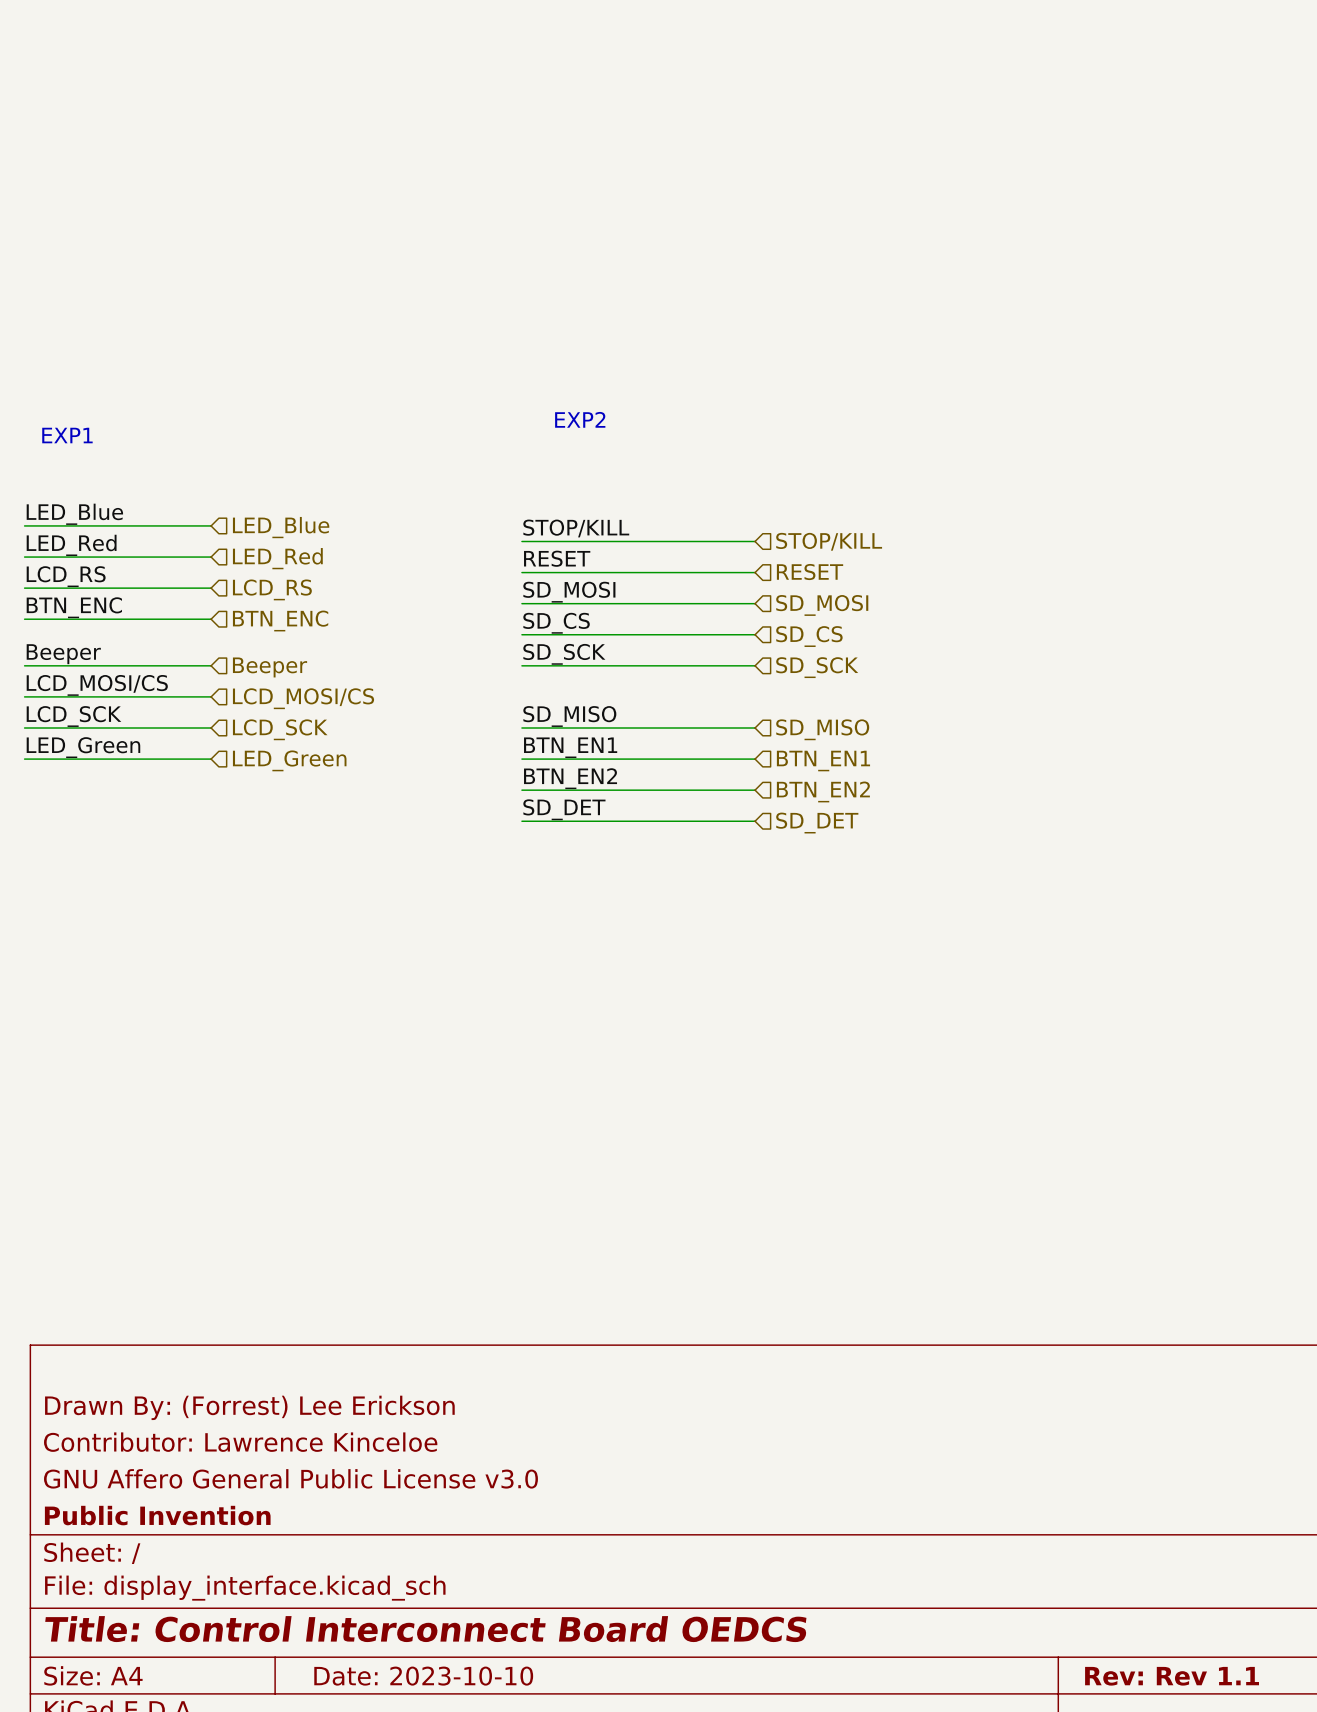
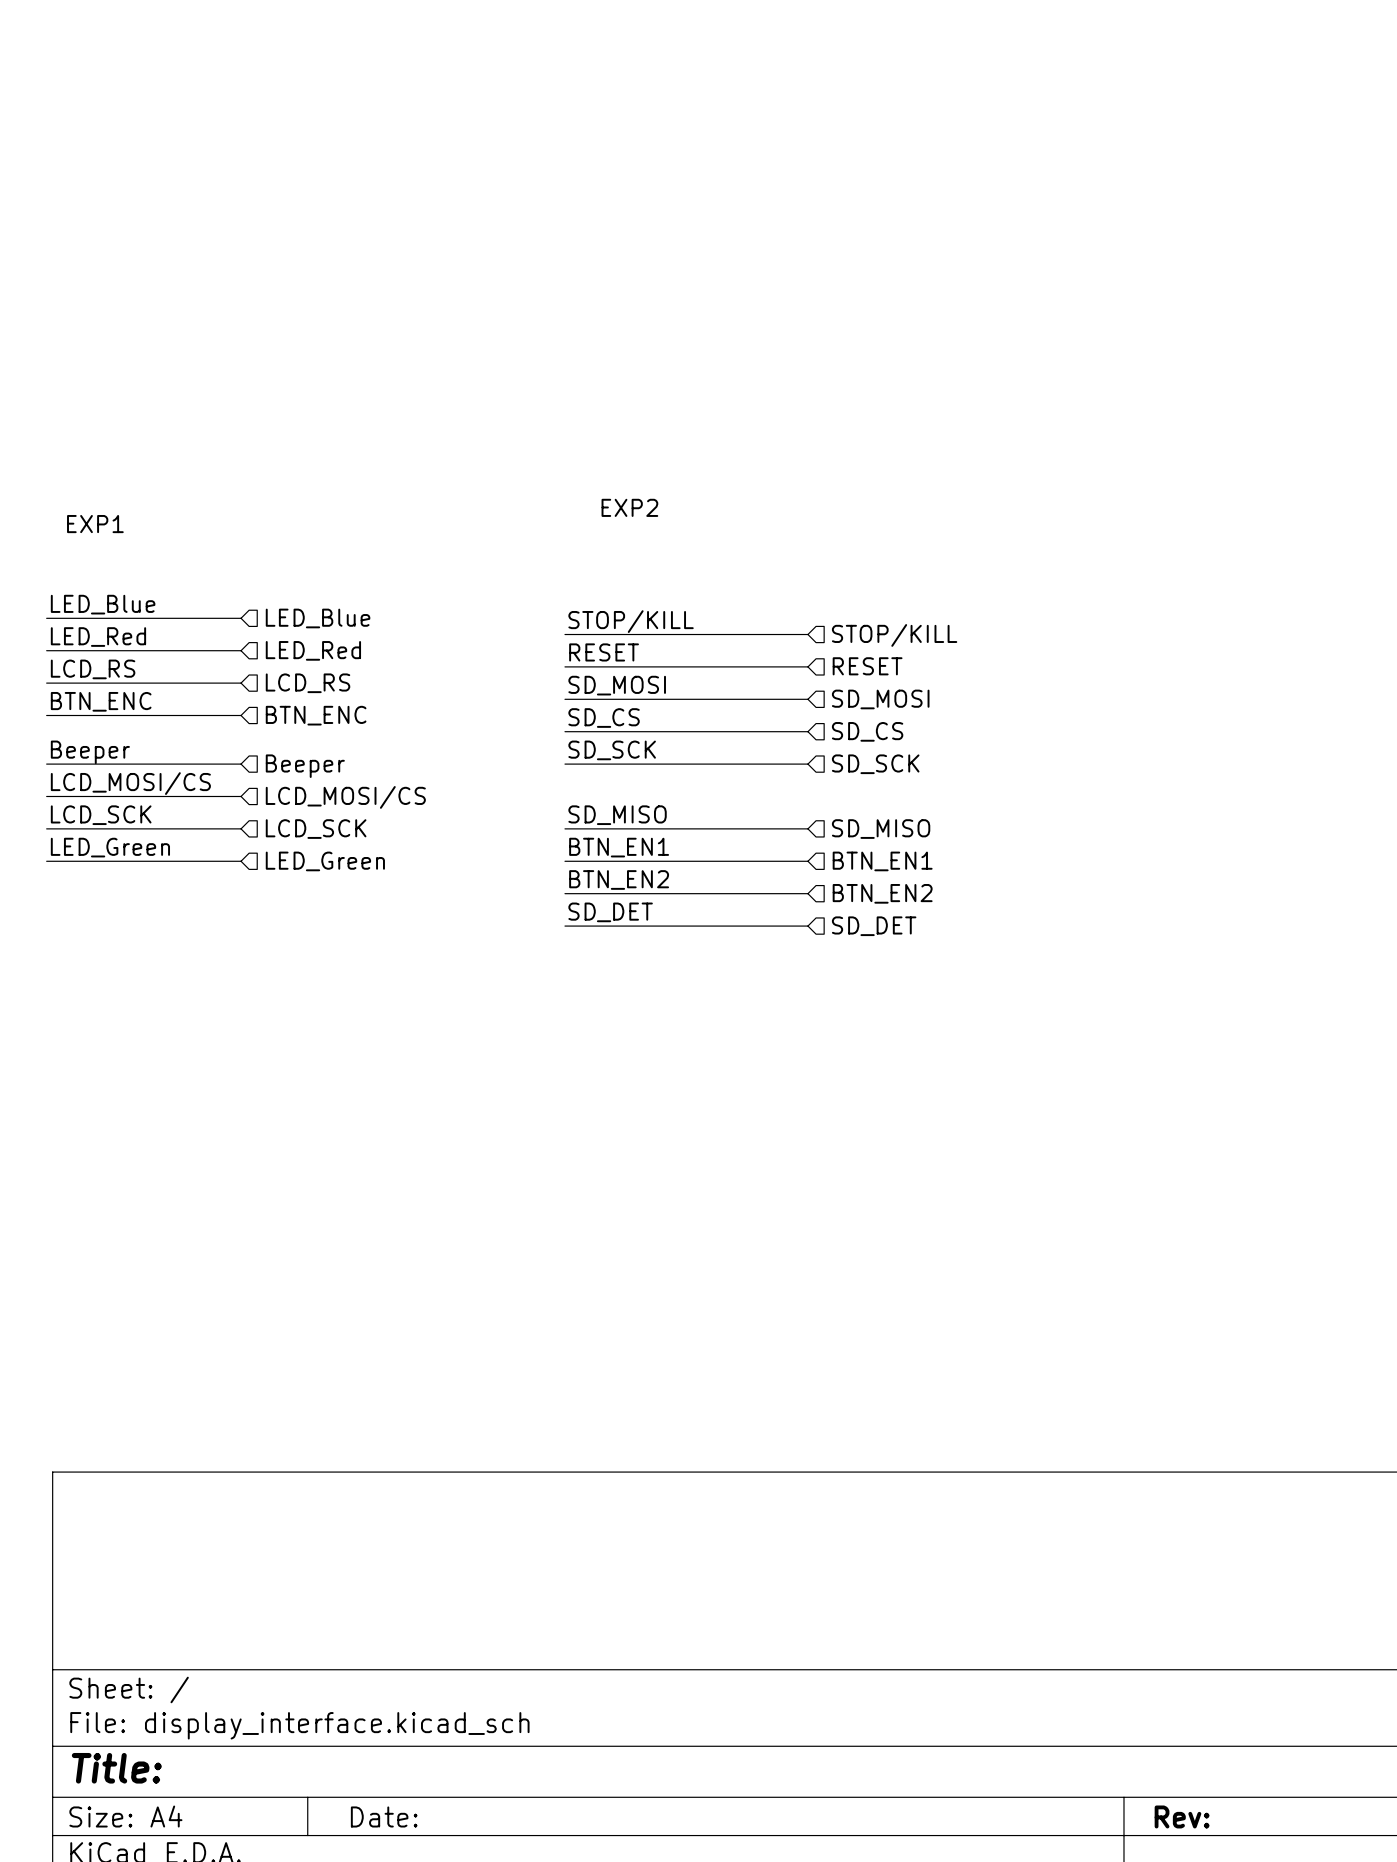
title block: Drawn By: (Forrest) Lee Erickson (249, 1407) -> none
title block: Contributor: Lawrence Kinceloe (240, 1442) -> none
title block: GNU Affero General Public License v3.0 (290, 1478) -> none
title block: Public Invention (157, 1515) -> none
title block: Title: Control Interconnect Board OEDCS (425, 1629) -> Title: (116, 1768)
title block: Date: 2023-10-10 (423, 1676) -> Date: (384, 1816)
title block: Rev: Rev 1.1 (1172, 1676) -> Rev: (1182, 1816)

